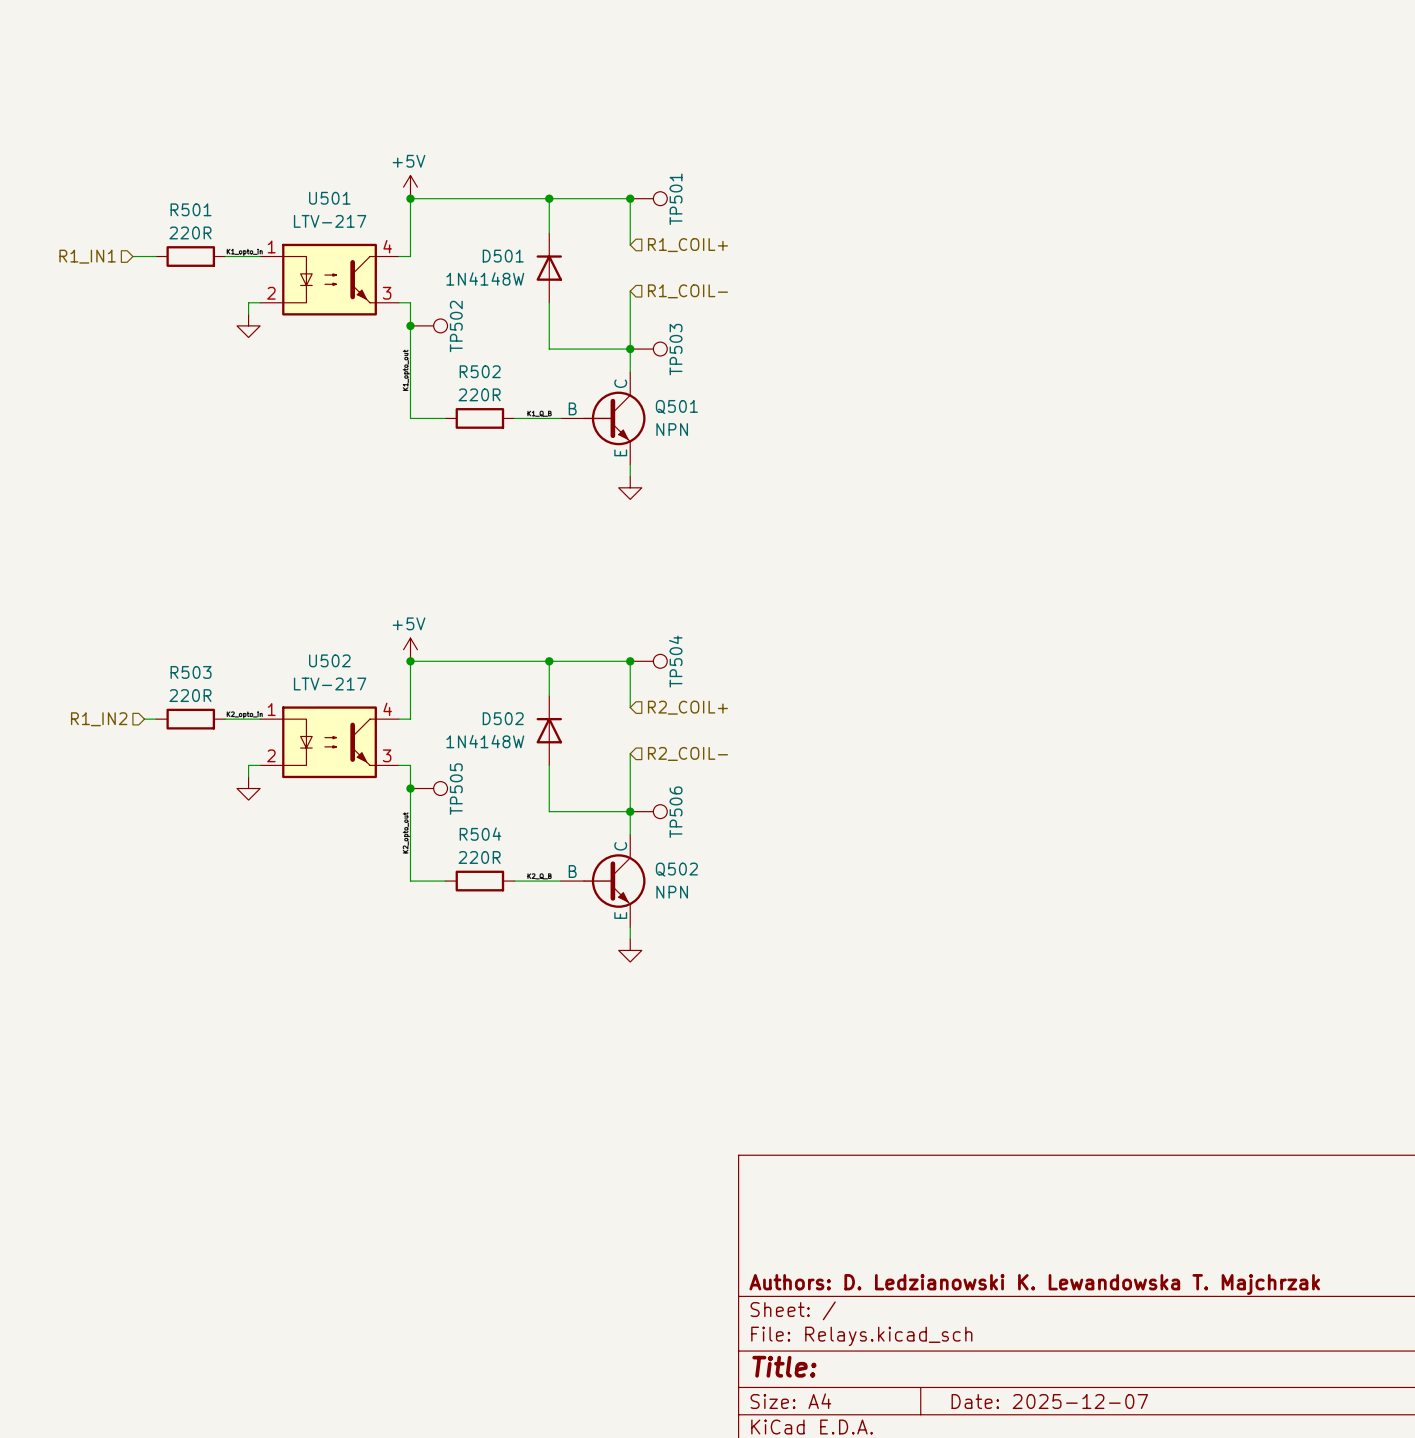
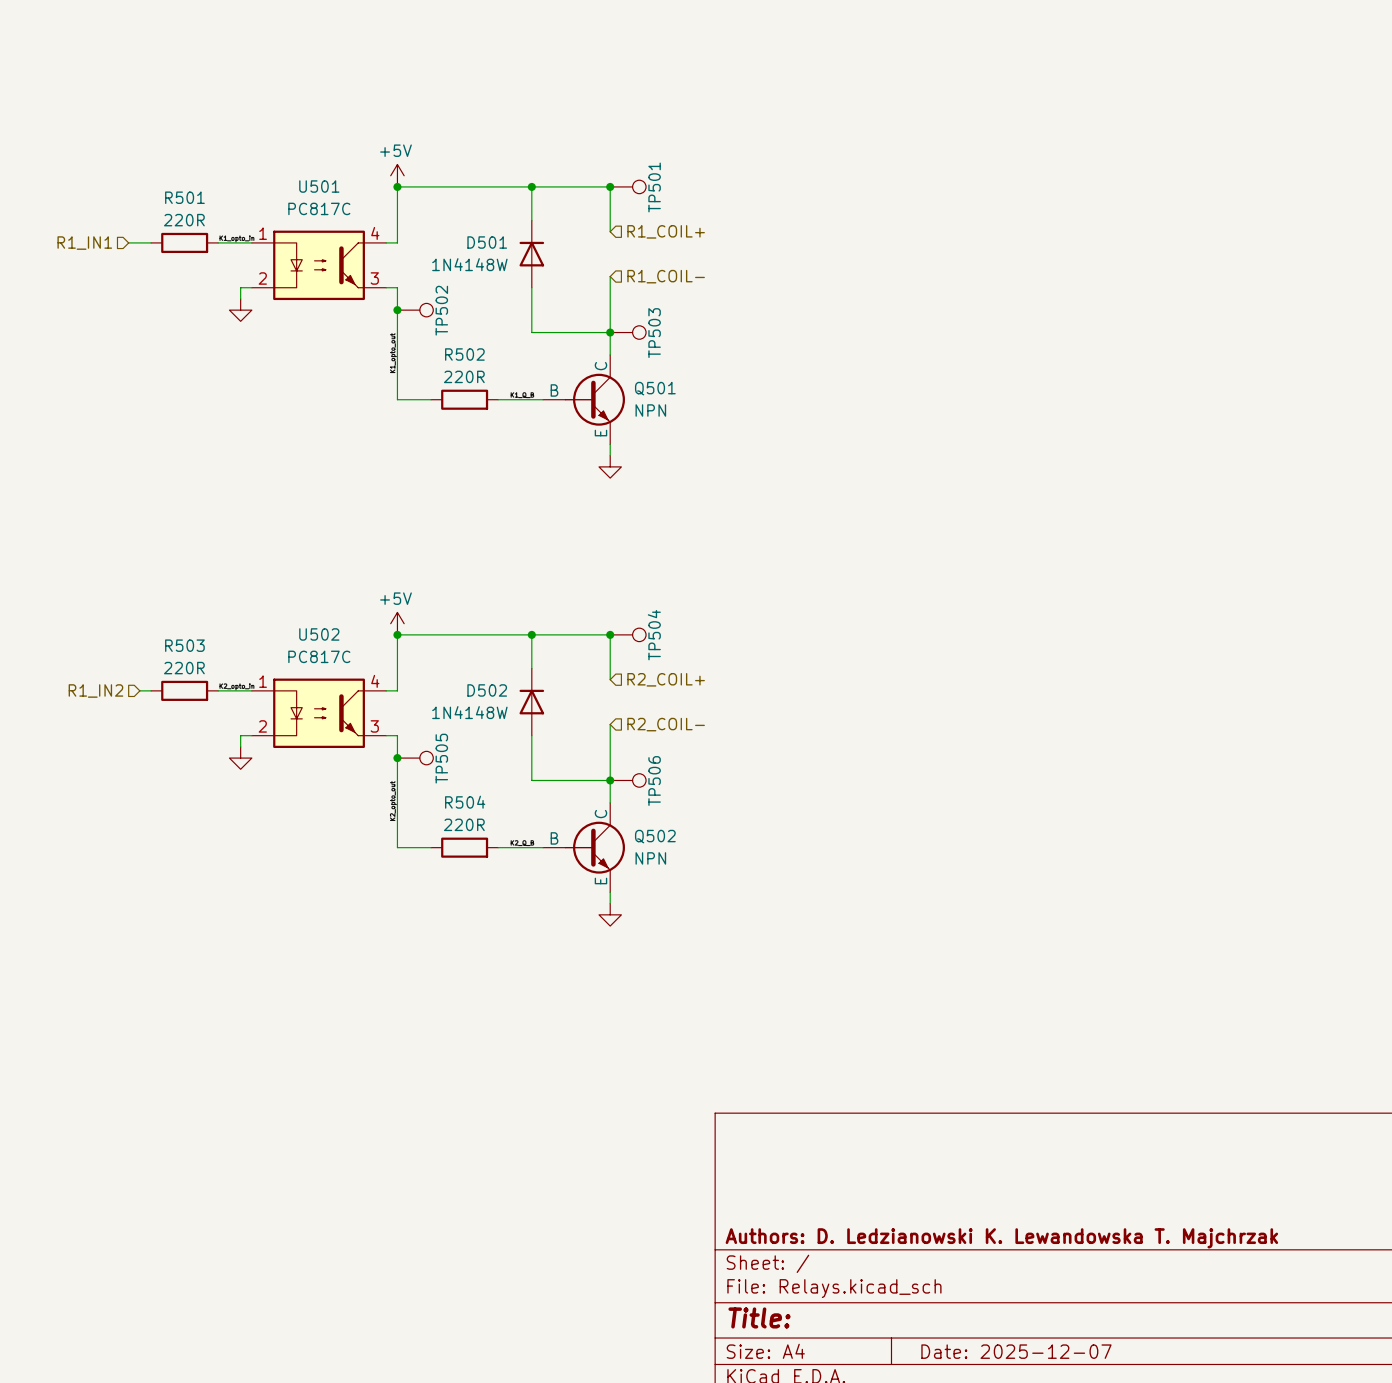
U501 value: LTV-217 (330, 221) -> PC817C (319, 208)
U502 value: LTV-217 (330, 684) -> PC817C (319, 656)

